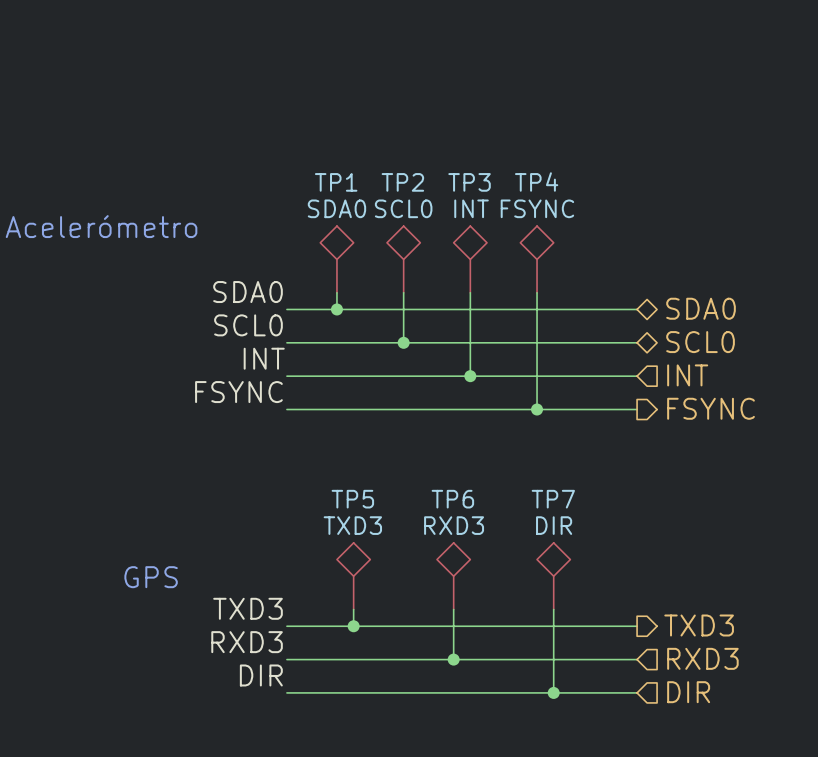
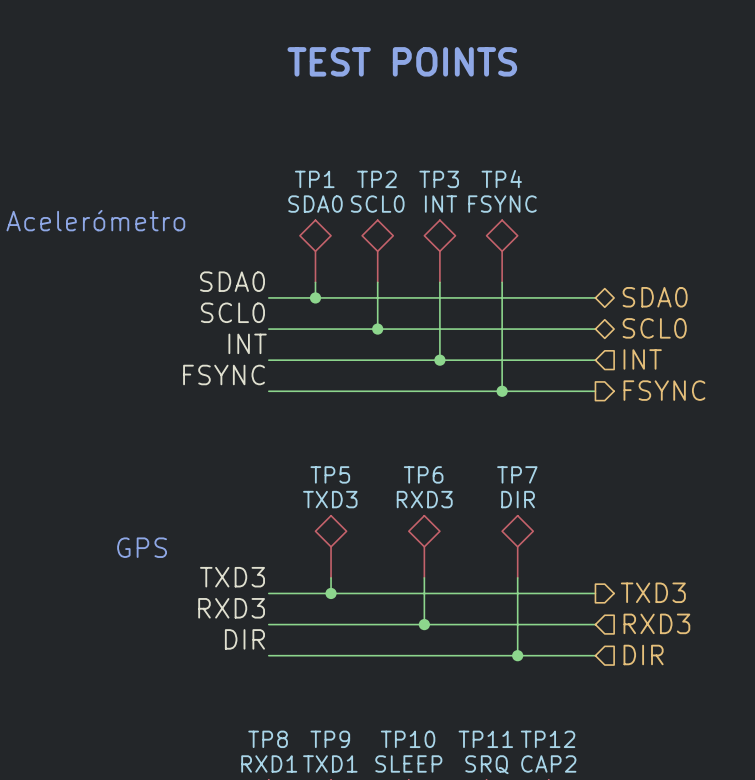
text: none -> TEST POINTS (402, 61)

